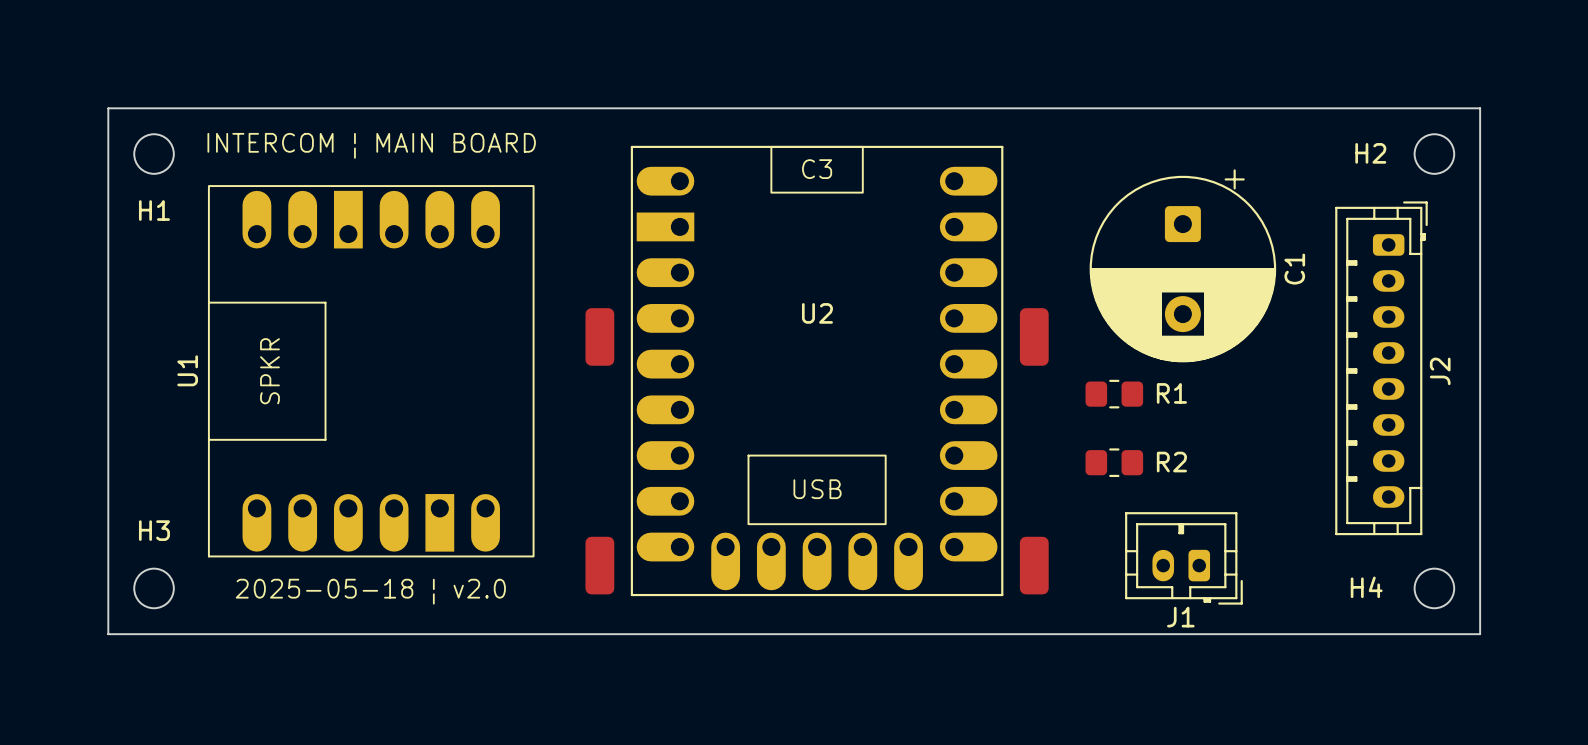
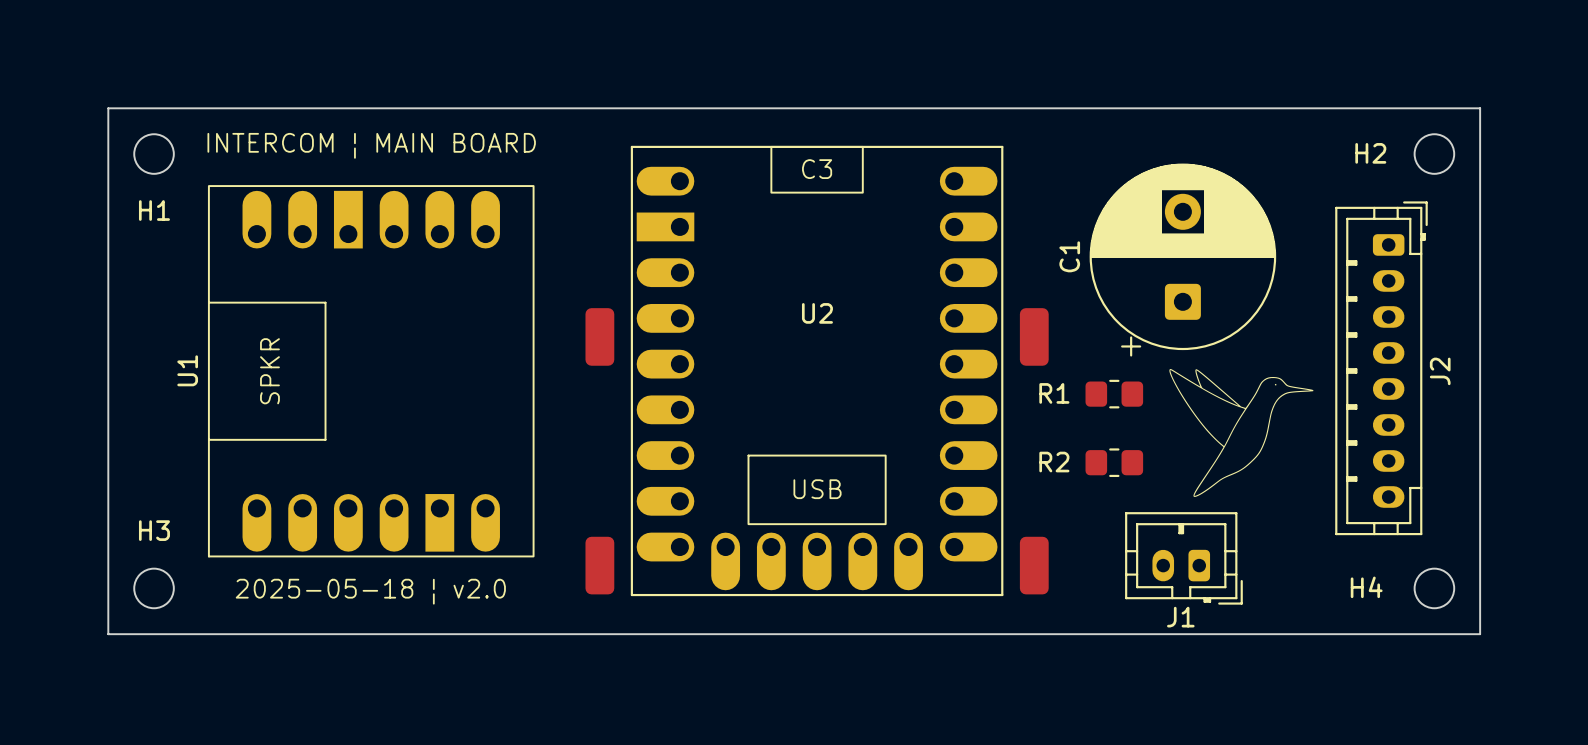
C1 rotation: 0° (1182, 265) -> 180° (1182, 260)
drawing: none -> [1169, 369, 1314, 497]
R1 name position: R1 (1171, 393) -> R1 (1054, 393)
R2 name position: R2 (1171, 462) -> R2 (1054, 462)

